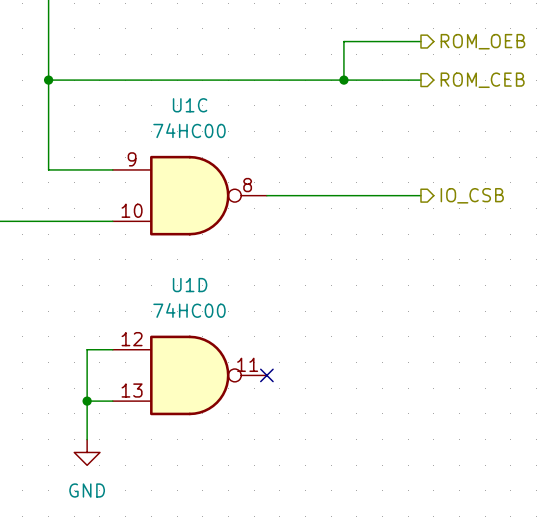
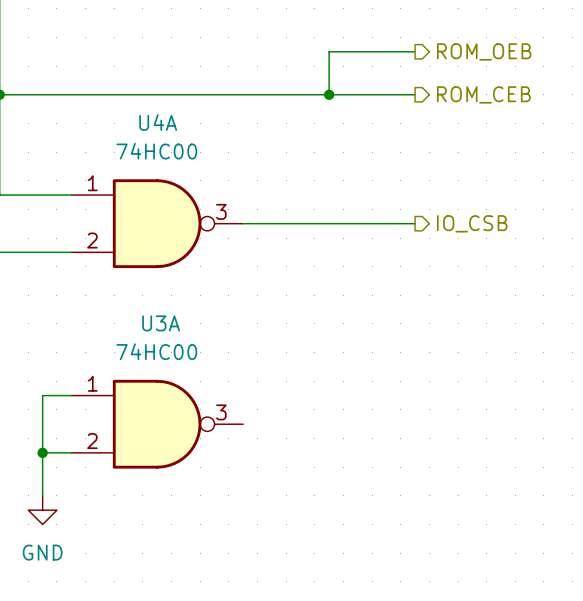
U1C name: U1C (190, 105) -> U4A (158, 122)
U1C pin number: 9 (132, 159) -> 1 (92, 183)
U1C pin number: 8 (247, 185) -> 3 (221, 211)
U1C pin number: 10 (132, 210) -> 2 (92, 240)
U1D name: U1D (190, 285) -> U3A (161, 323)
U1D pin number: 12 (132, 339) -> 1 (92, 383)
U1D pin number: 11 (247, 364) -> 3 (221, 412)
no-connect mark: (266, 375) -> none
U1D pin number: 13 (132, 390) -> 2 (92, 441)

